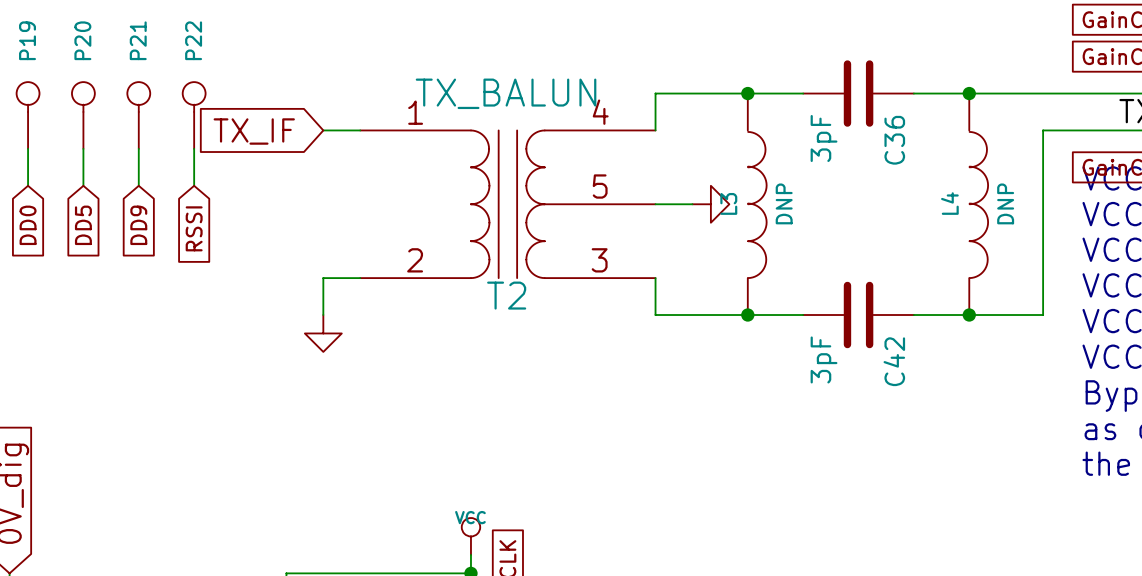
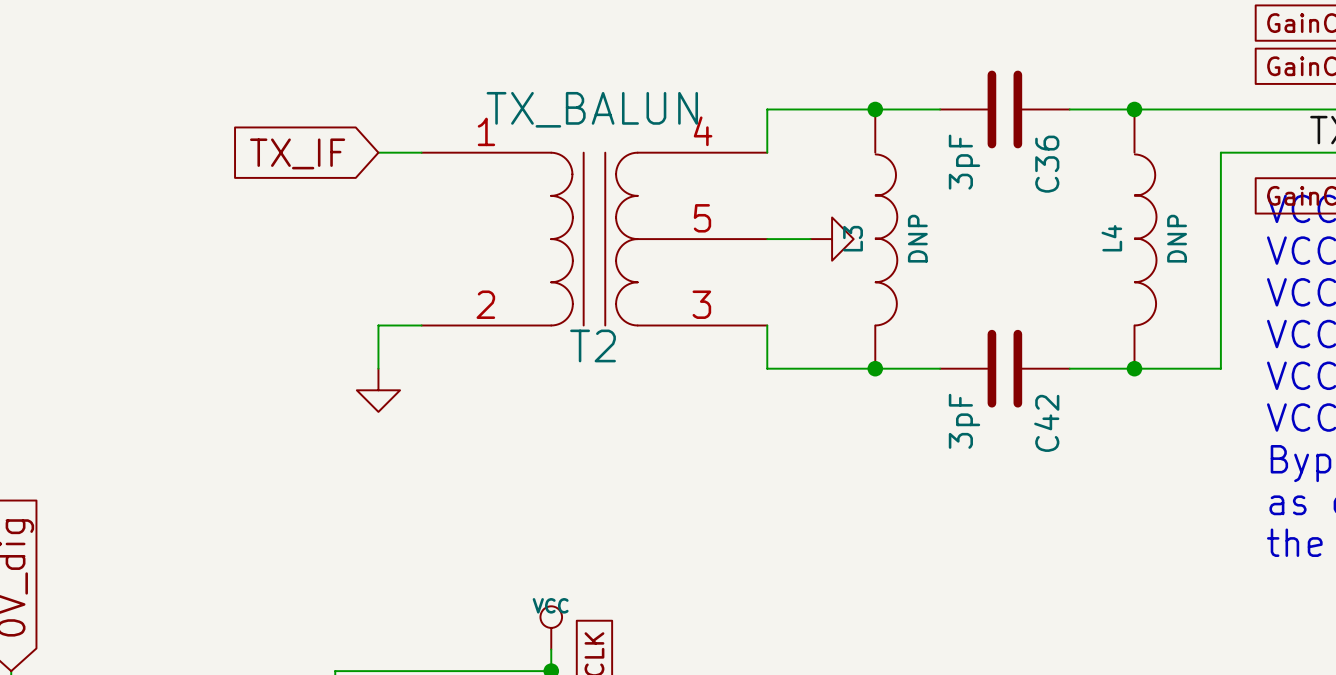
P19: (28, 115) -> none
P20: (83, 115) -> none
P21: (138, 115) -> none
P22: (194, 115) -> none
wire: (28, 148) (28, 185) -> none
wire: (83, 148) (83, 185) -> none
wire: (138, 148) (138, 185) -> none
wire: (194, 148) (194, 185) -> none
global label: DD0 (28, 225) -> none
global label: DD5 (83, 225) -> none
global label: DD9 (138, 225) -> none
global label: RSSI (194, 228) -> none

